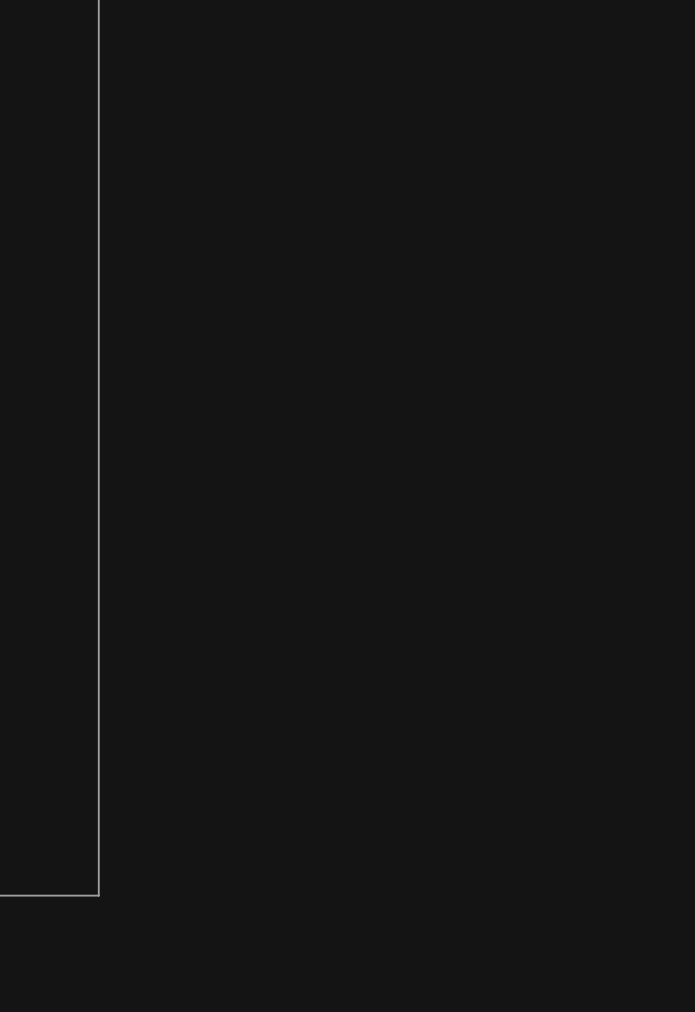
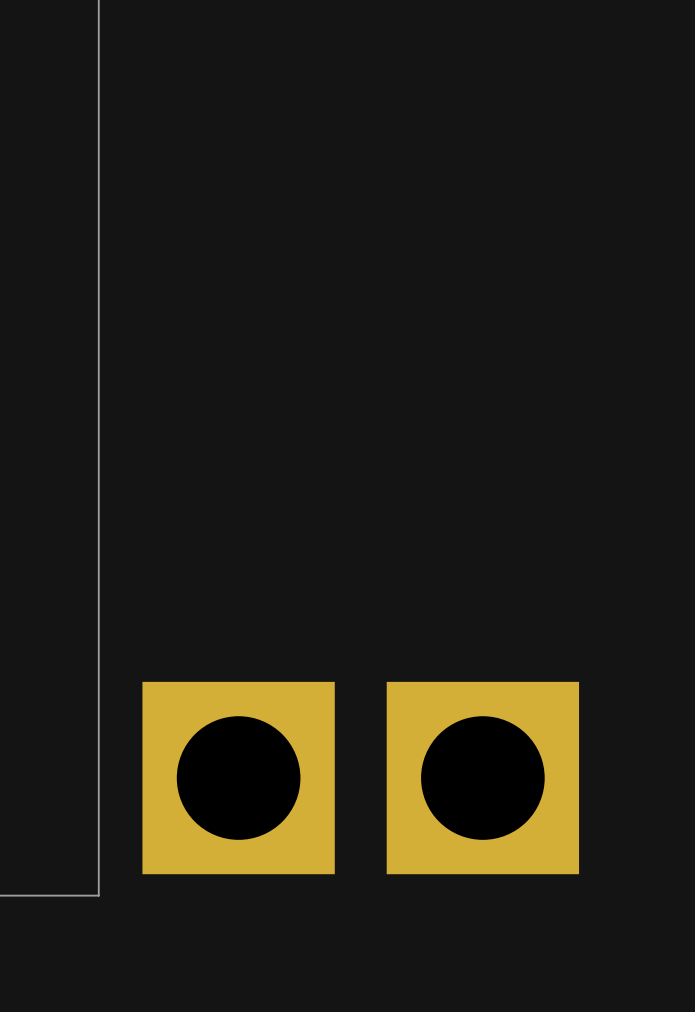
part: none -> (238, 778)
part: none -> (482, 778)

